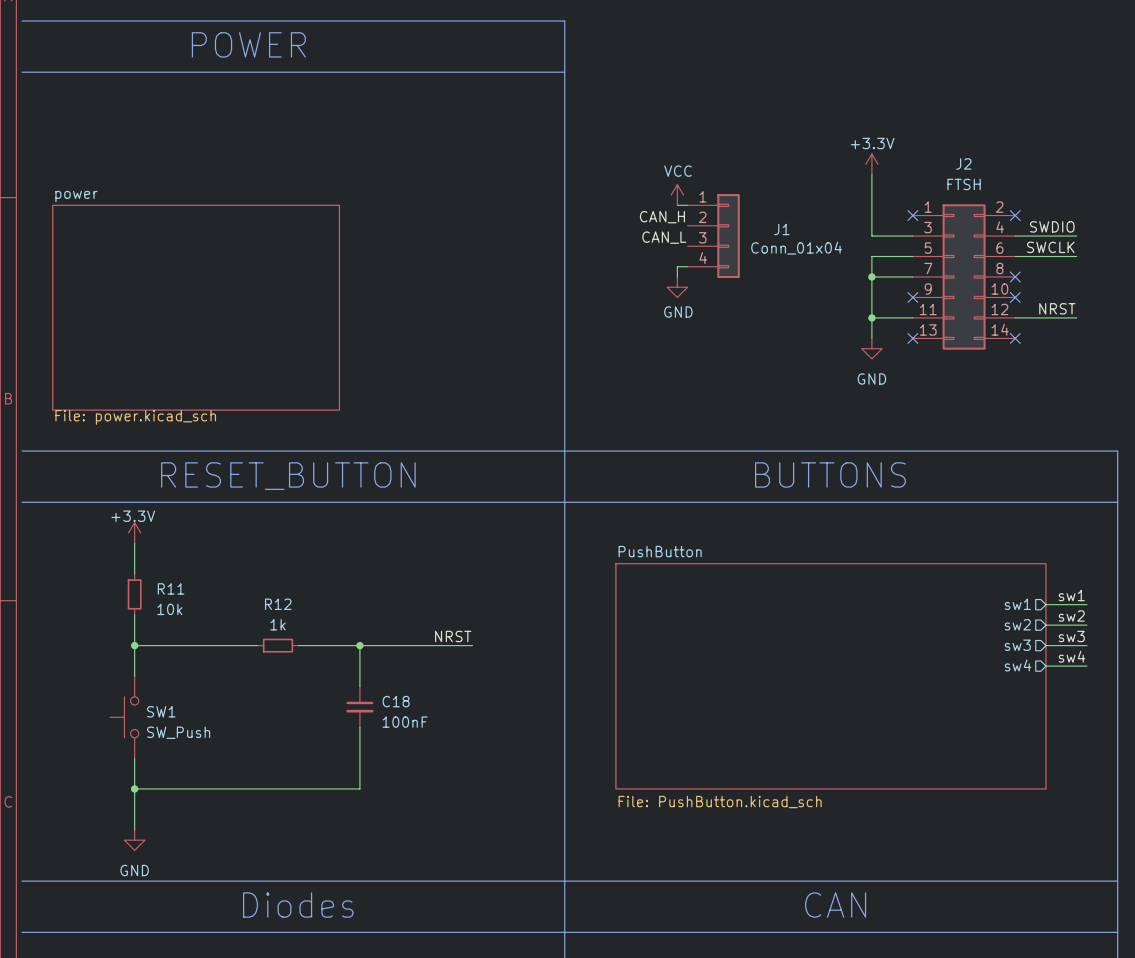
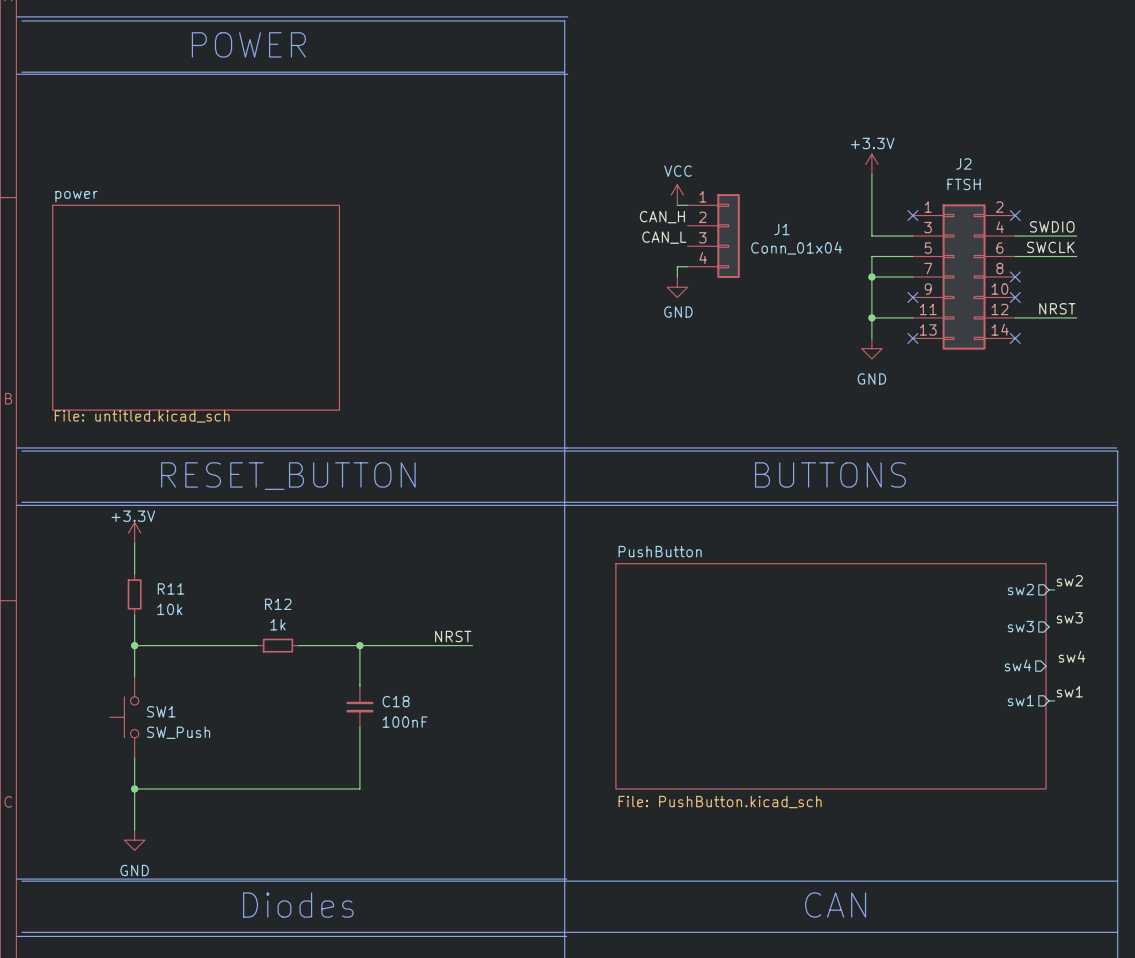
line: none -> (16, 16) (567, 16)
line: none -> (16, 74) (567, 74)
sheet power value: File: power.kicad_sch (135, 417) -> File: untitled.kicad_sch (142, 416)
line: none -> (16, 447) (1116, 447)
line: none -> (16, 505) (1116, 505)
wire: none -> (1049, 589) (1054, 589)
label position: sw1 (1071, 595) -> sw1 (1069, 691)
sheet pin position: sw1 (1017, 604) -> sw1 (1020, 700)
wire: (1045, 604) (1086, 604) -> none
label position: sw2 (1071, 616) -> sw2 (1069, 580)
sheet pin position: sw2 (1017, 624) -> sw2 (1020, 589)
wire: (1045, 625) (1086, 625) -> none
label position: sw3 (1071, 636) -> sw3 (1069, 617)
sheet pin position: sw3 (1017, 645) -> sw3 (1020, 626)
wire: (1045, 645) (1086, 645) -> none
wire: (1045, 666) (1086, 666) -> none
wire: none -> (1049, 700) (1054, 700)
line: none -> (16, 879) (566, 879)
line: none -> (16, 936) (566, 936)

